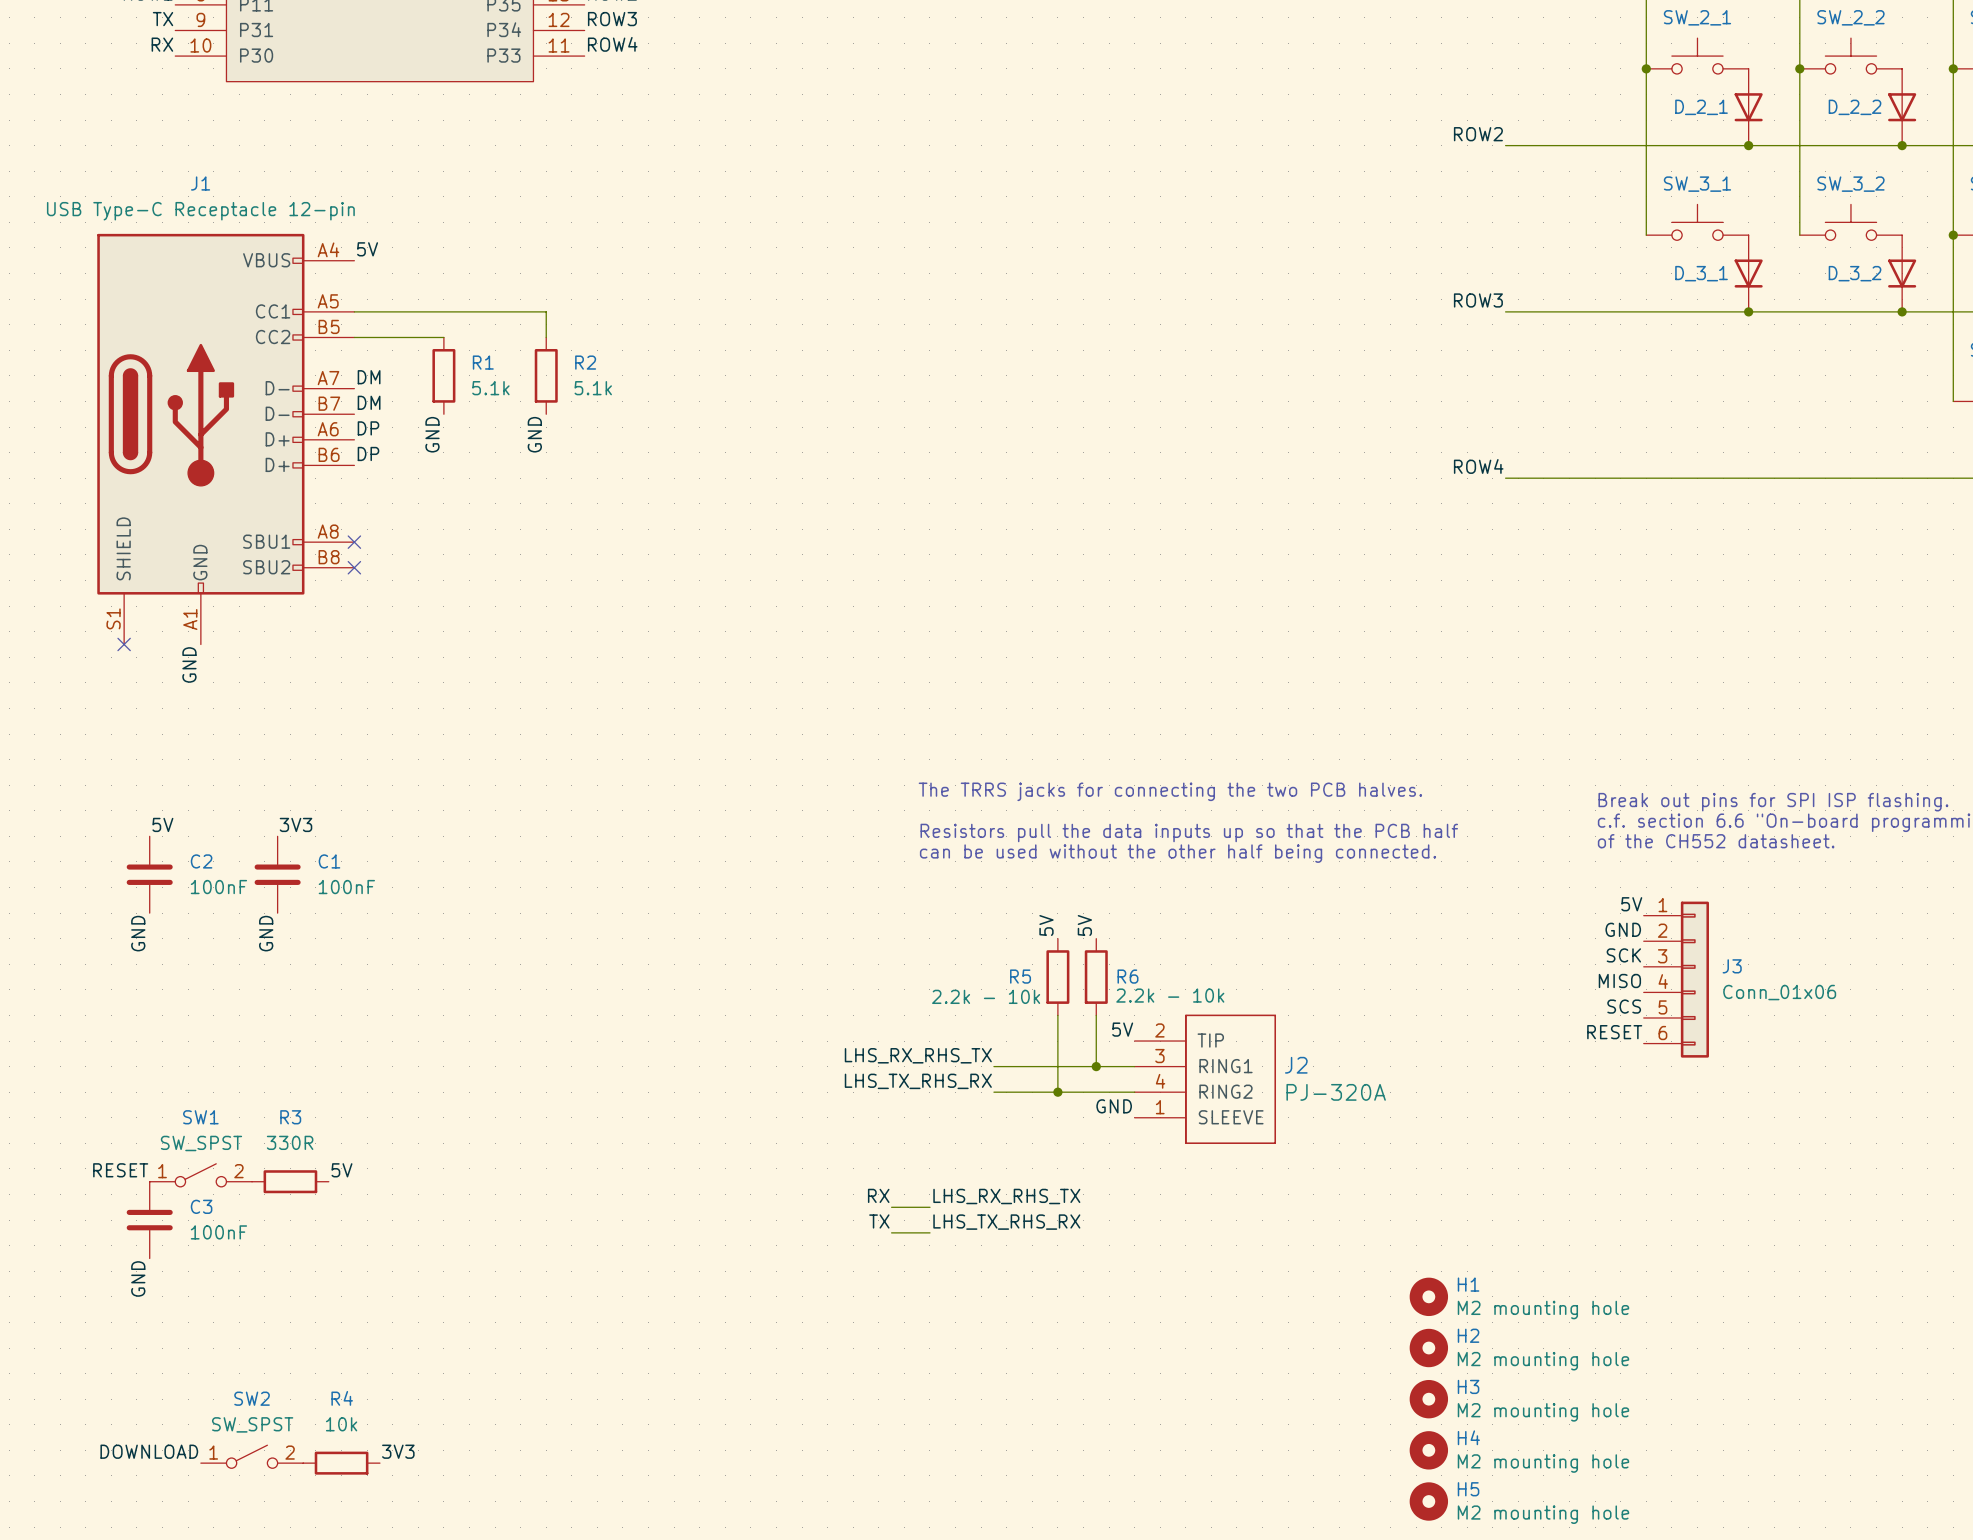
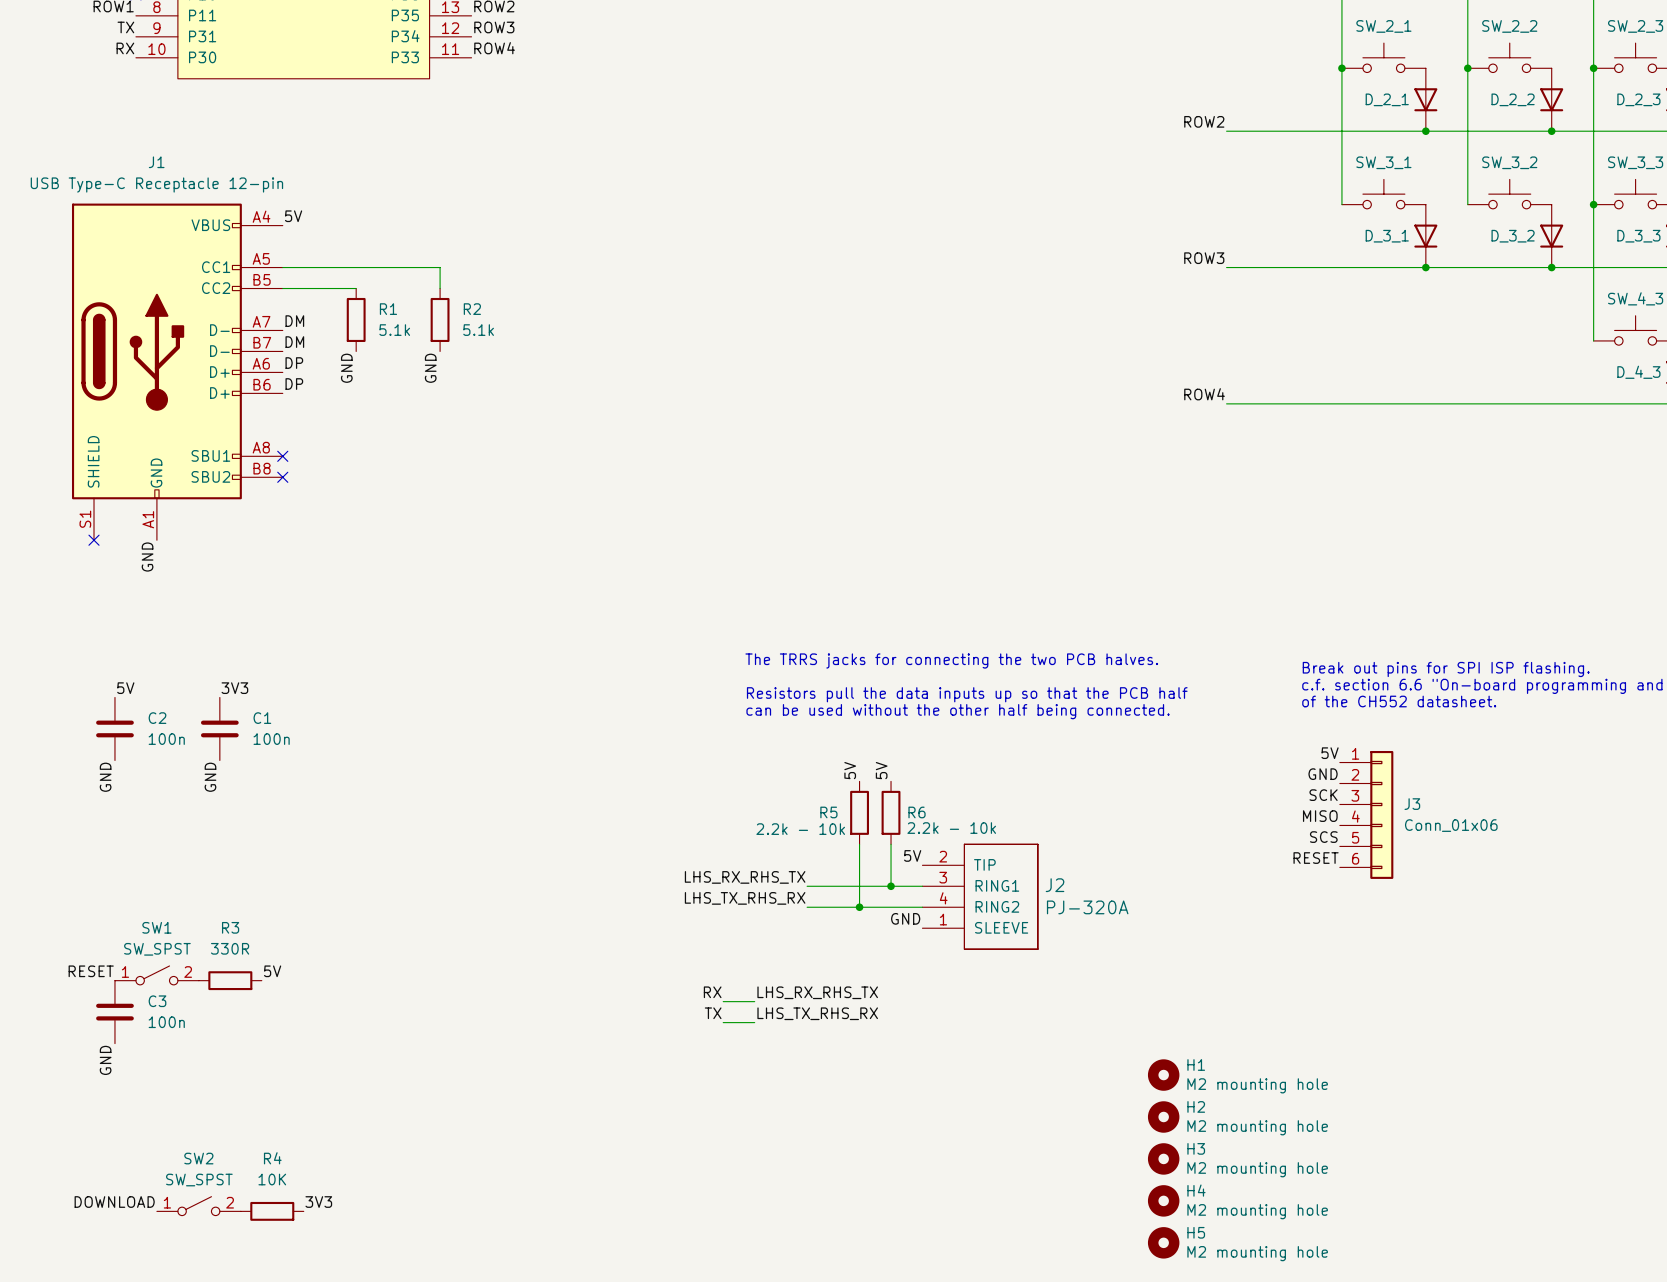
C2 value: 100nF (218, 887) -> 100n (166, 739)
C1 value: 100nF (346, 887) -> 100n (271, 739)
C3 value: 100nF (218, 1232) -> 100n (166, 1022)
R4 value: 10k (341, 1424) -> 10K (272, 1179)

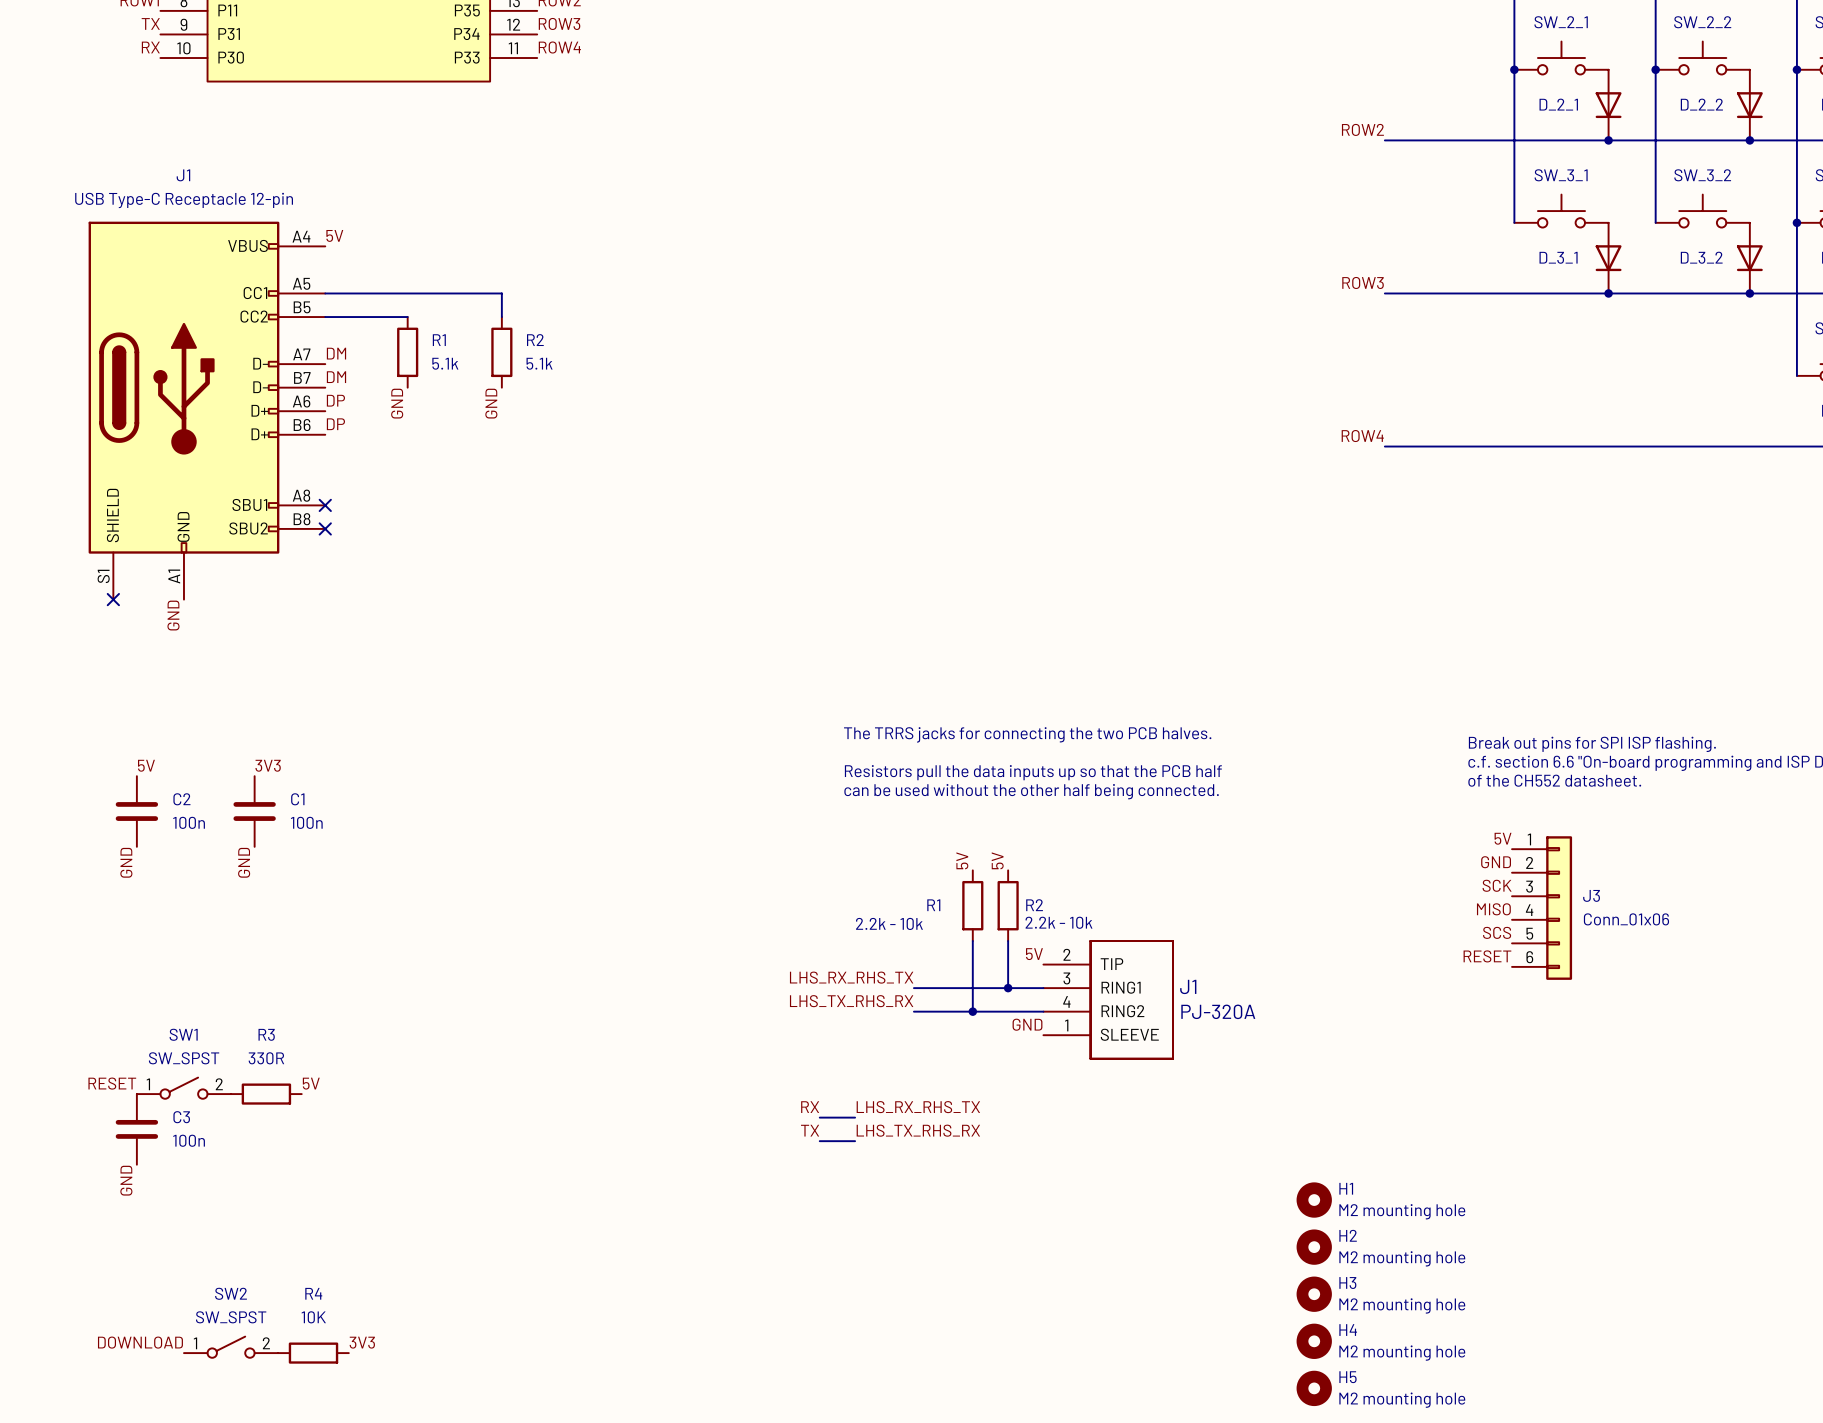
R5 name: R5 (828, 812) -> R1 (933, 905)
R6 name: R6 (917, 812) -> R2 (1034, 905)
J2 name: J2 (1055, 885) -> J1 (1188, 986)

